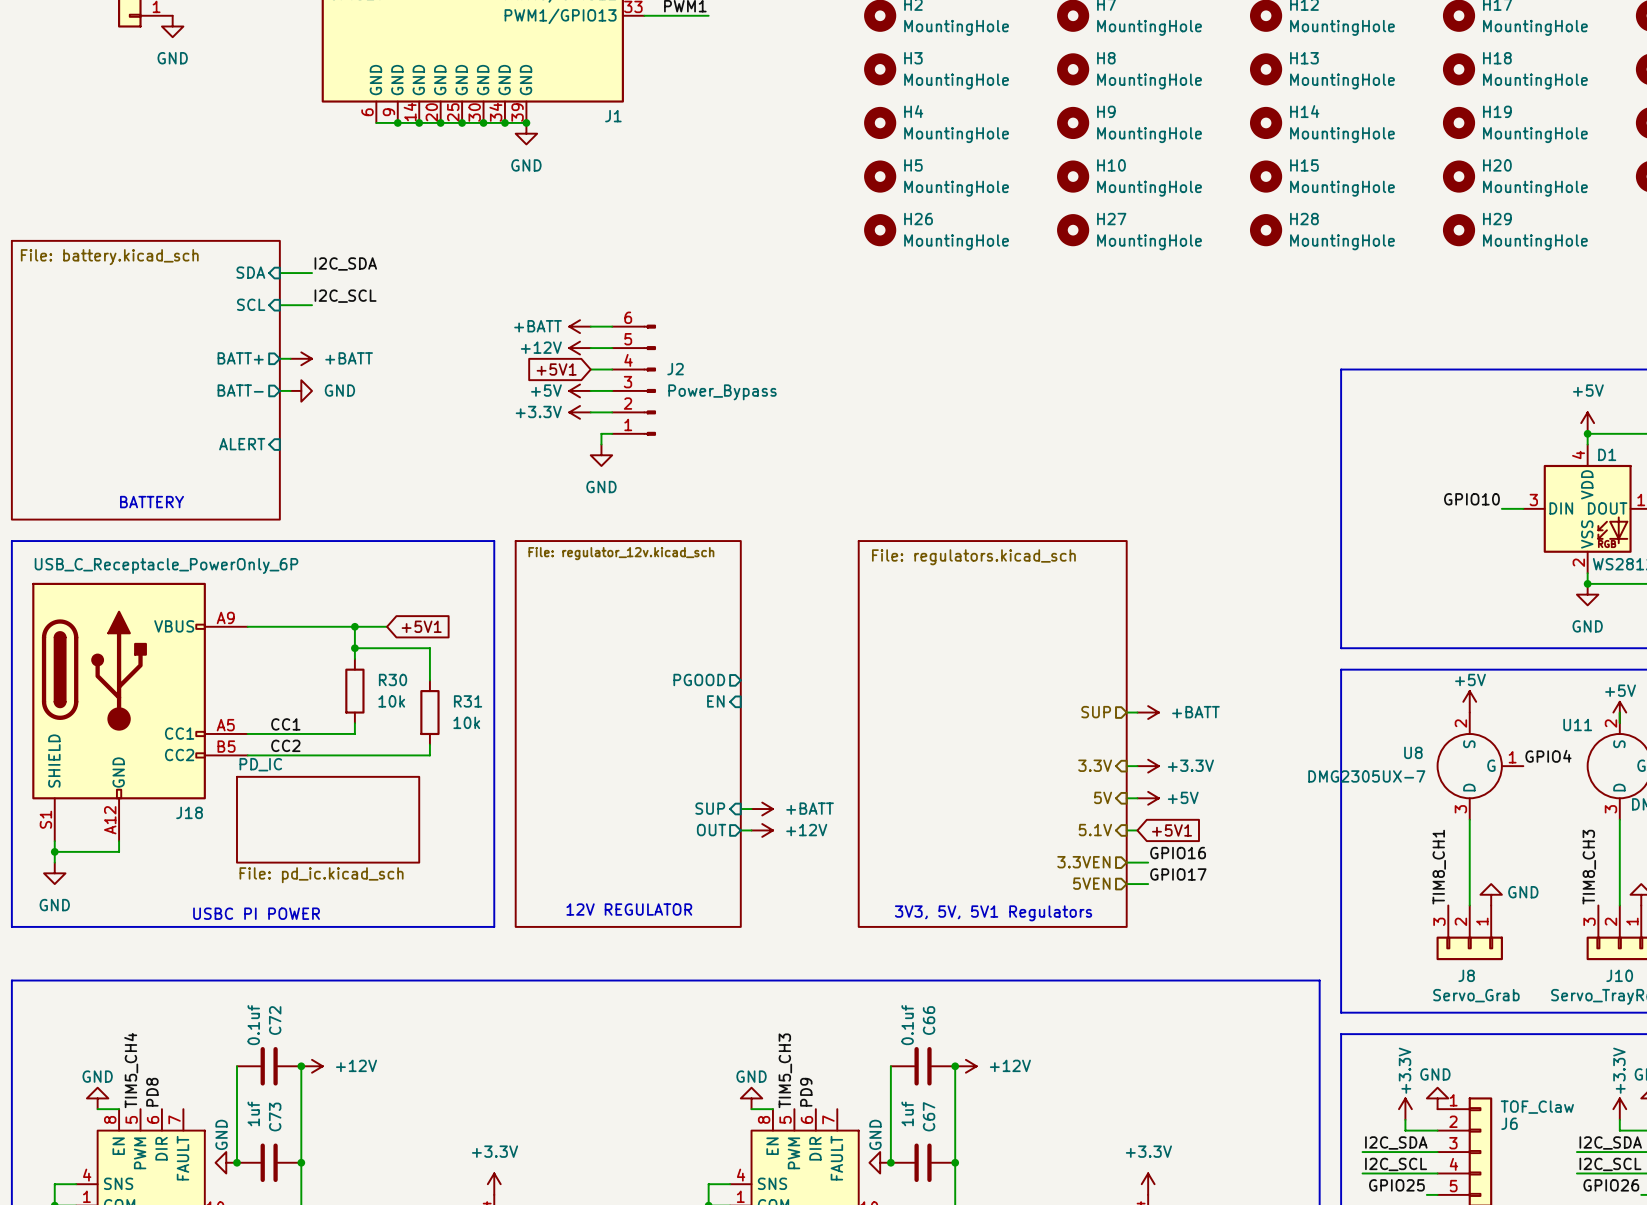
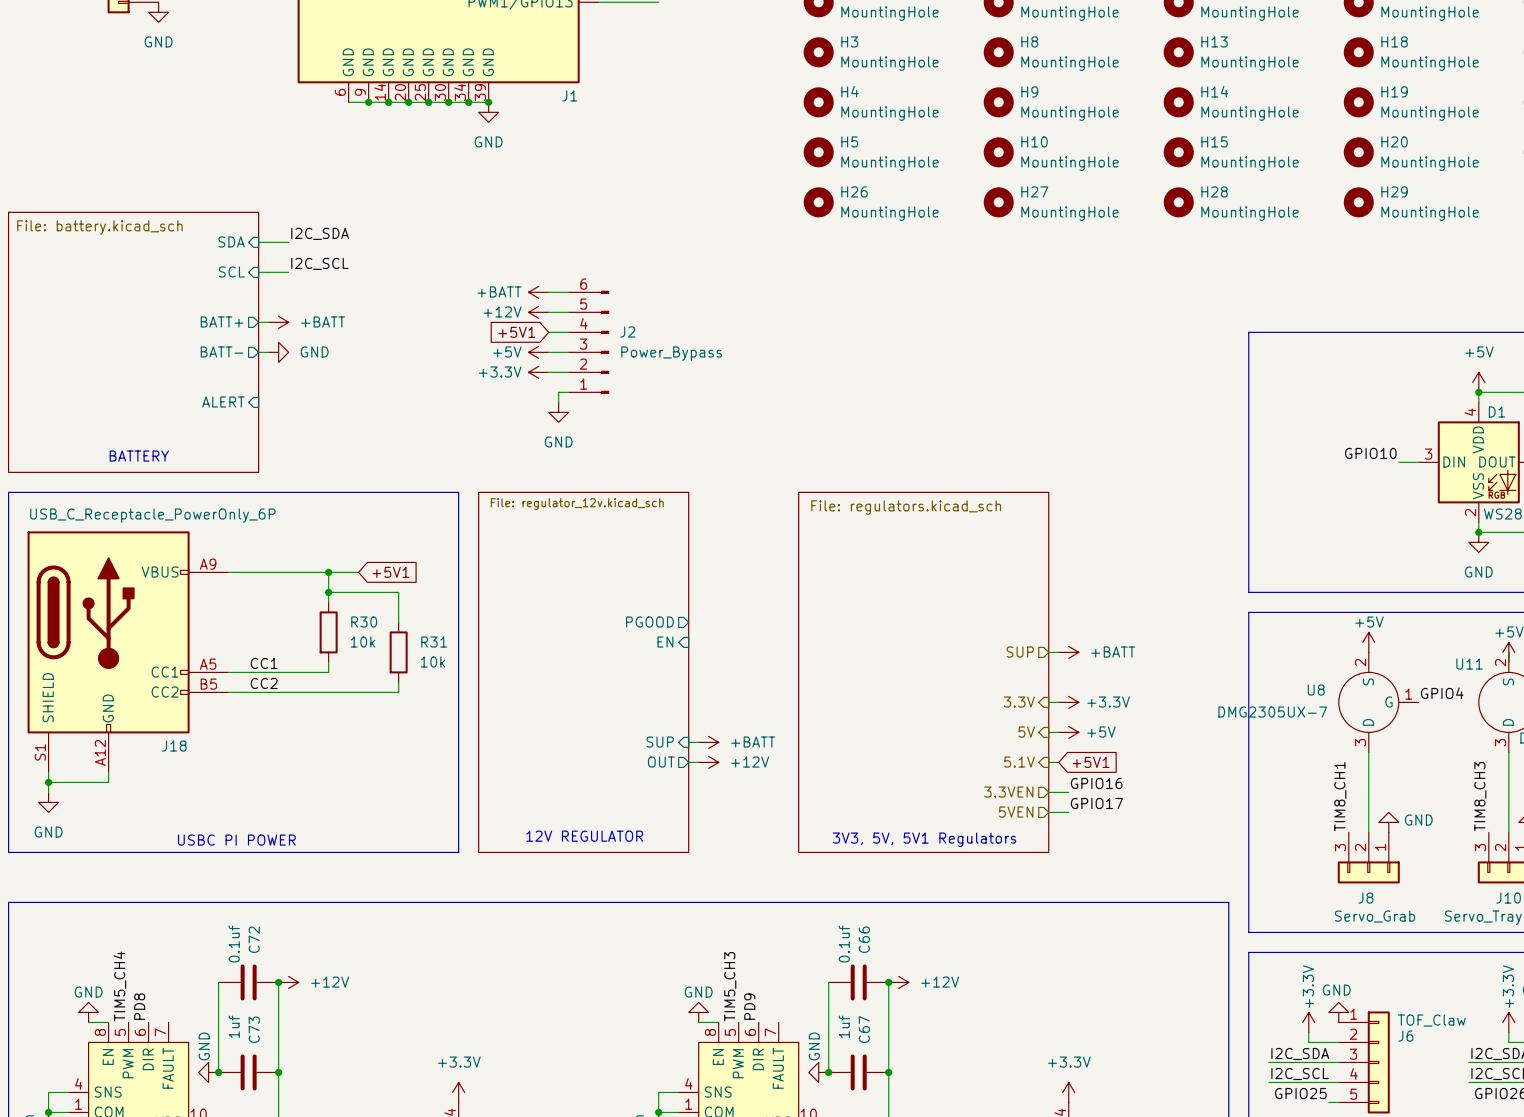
sheet PD_IC: File: pd_ic.kicad_sch (328, 819) -> none

